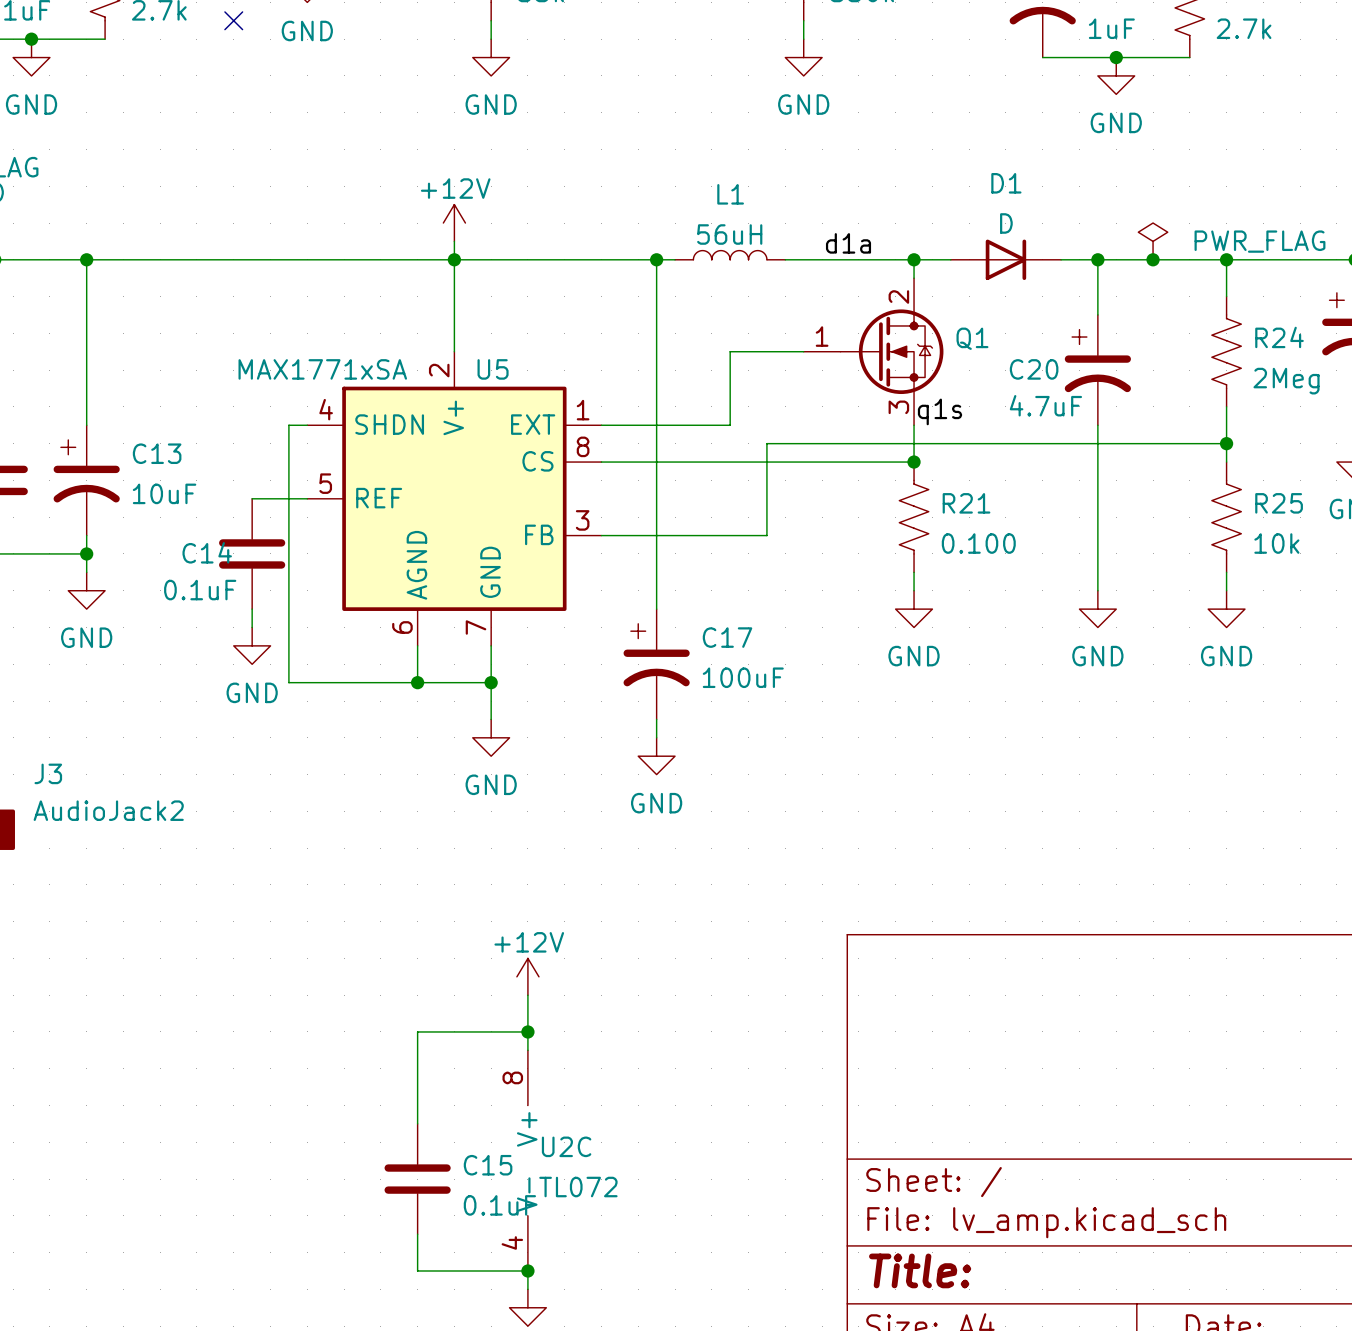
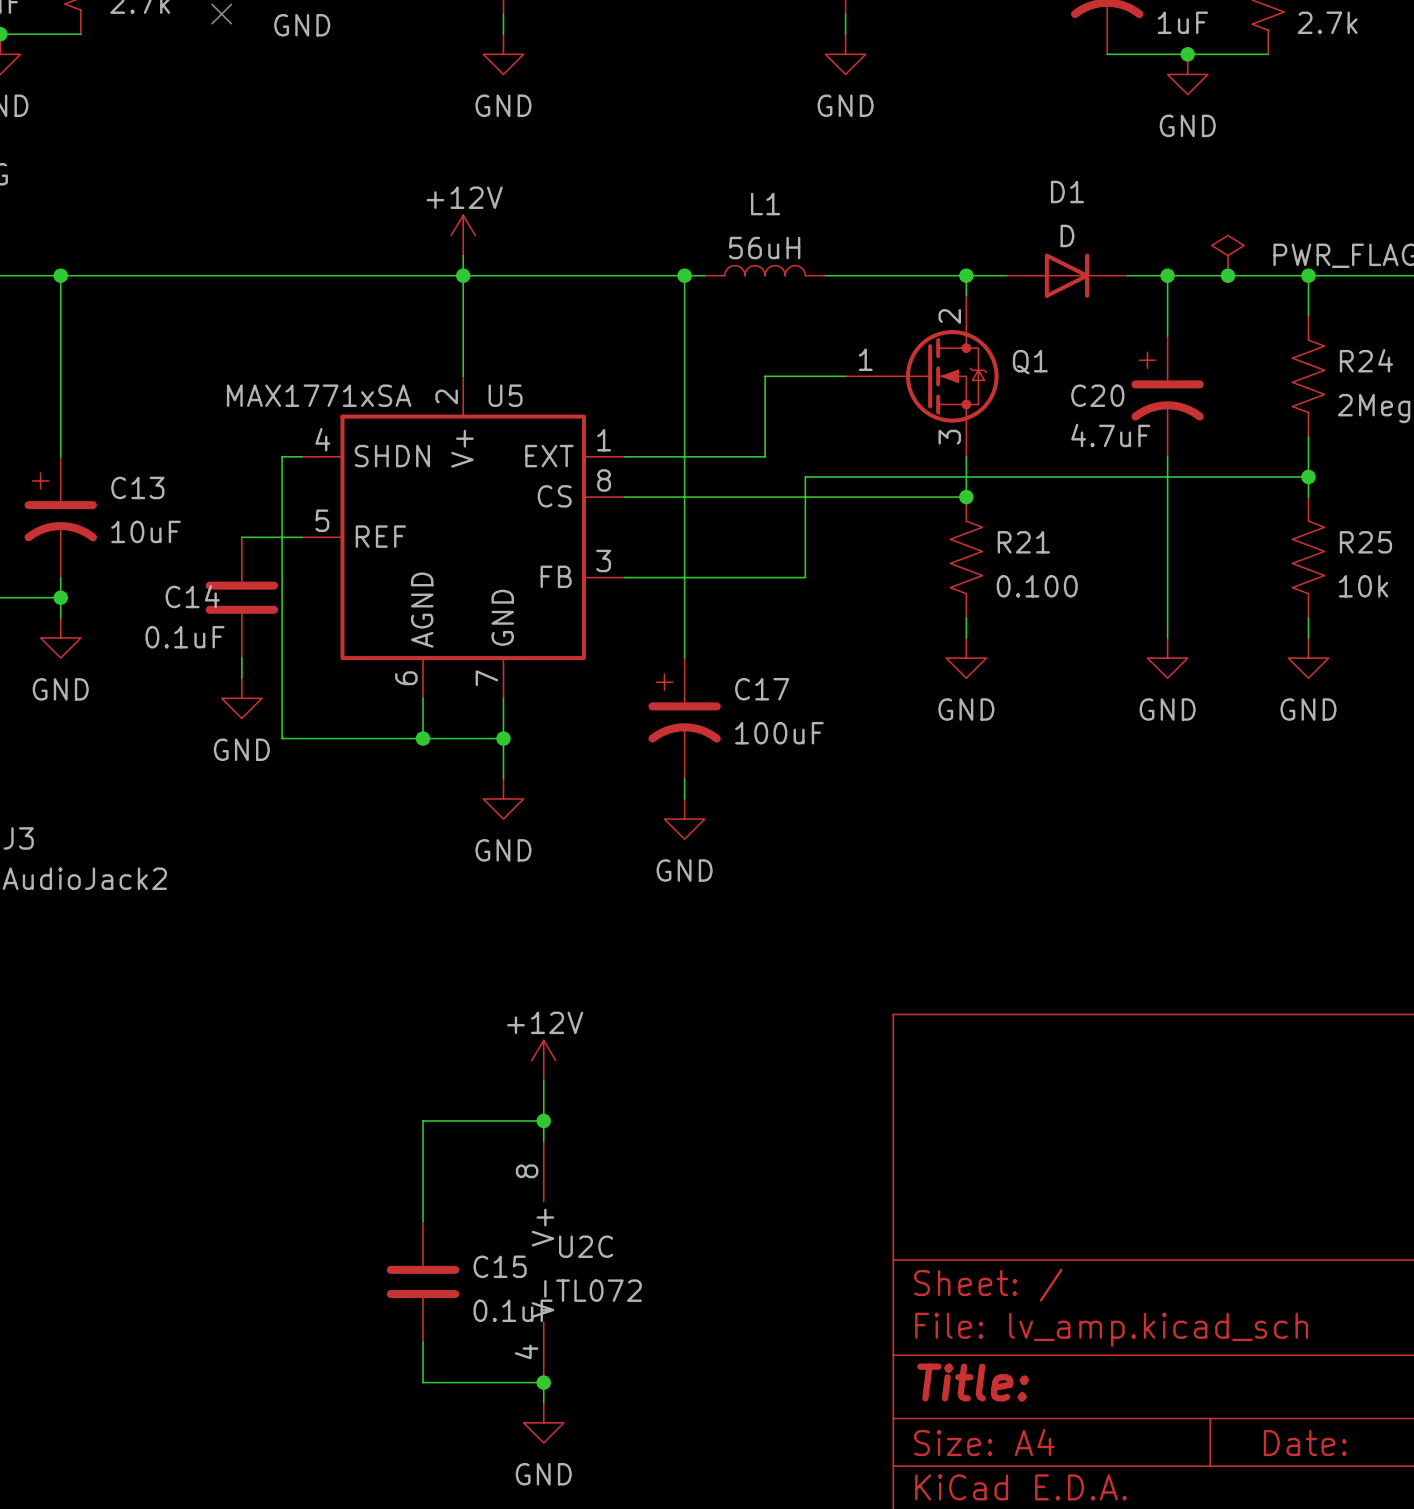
label: d1a (848, 243) -> none
label: q1s (939, 411) -> none

